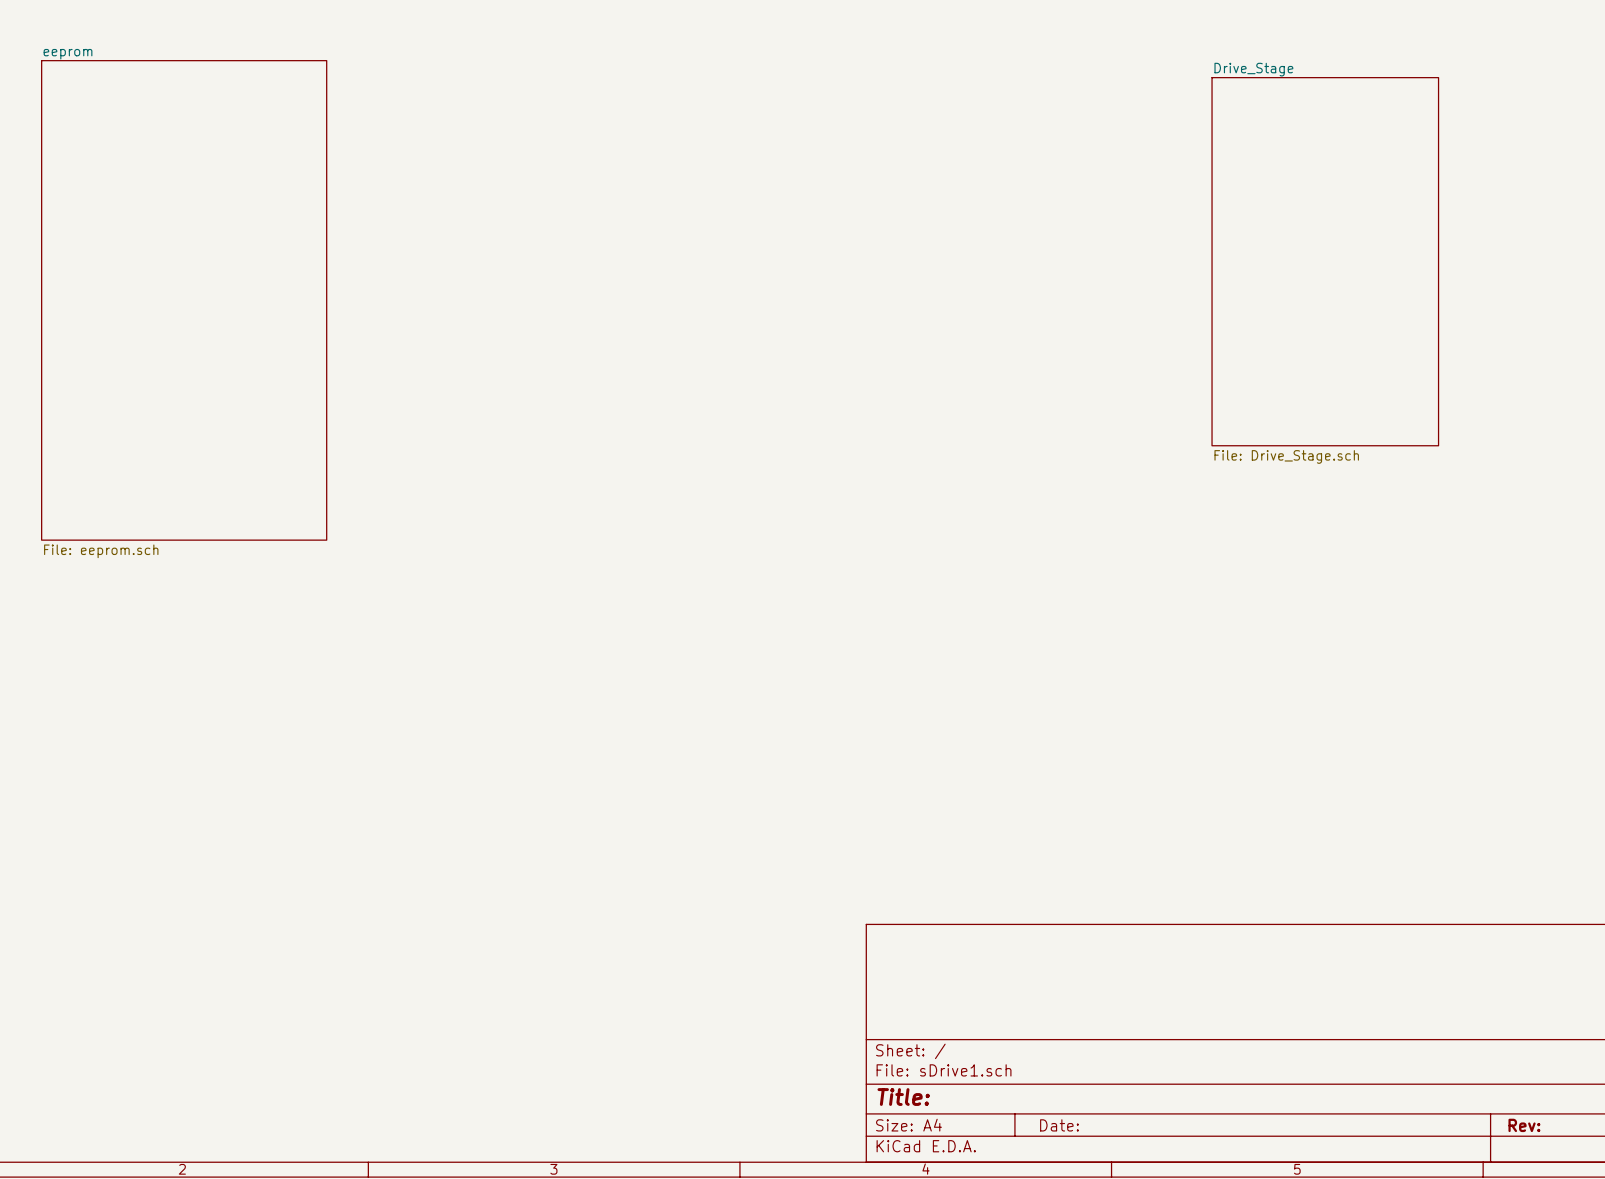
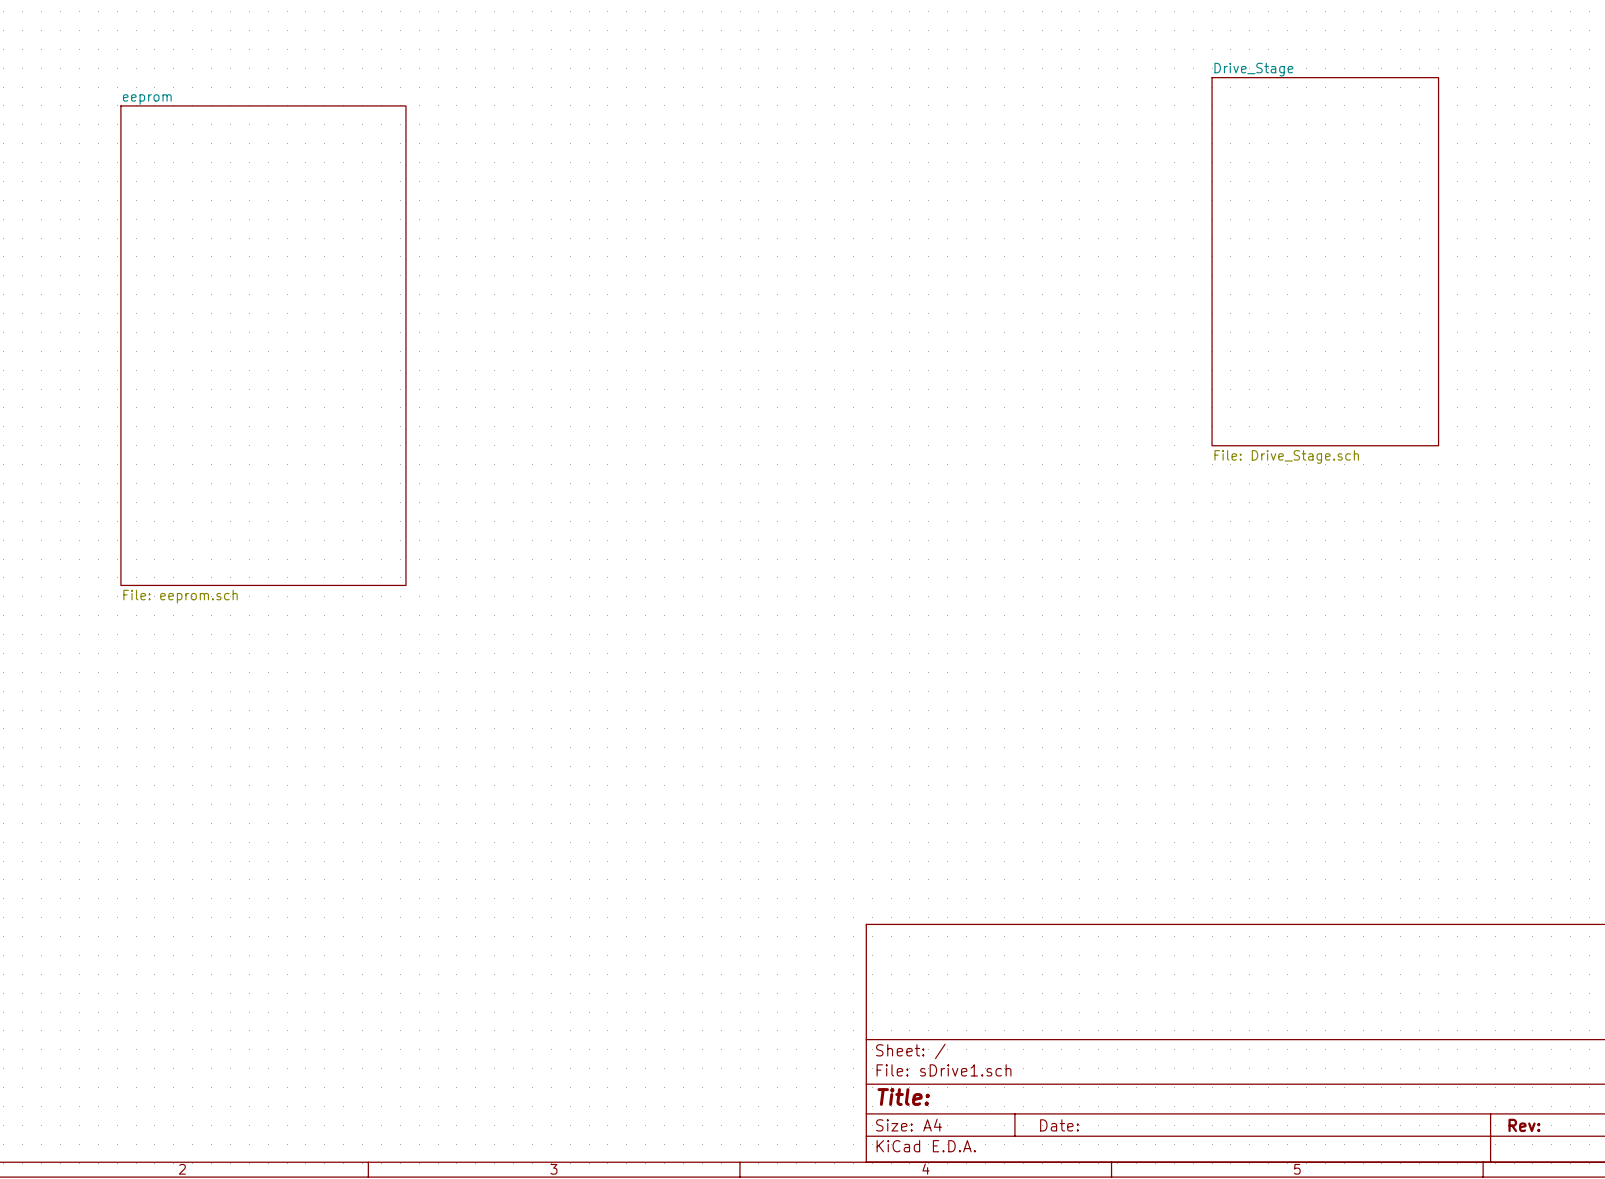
sheet eeprom position: (184, 300) -> (263, 345)

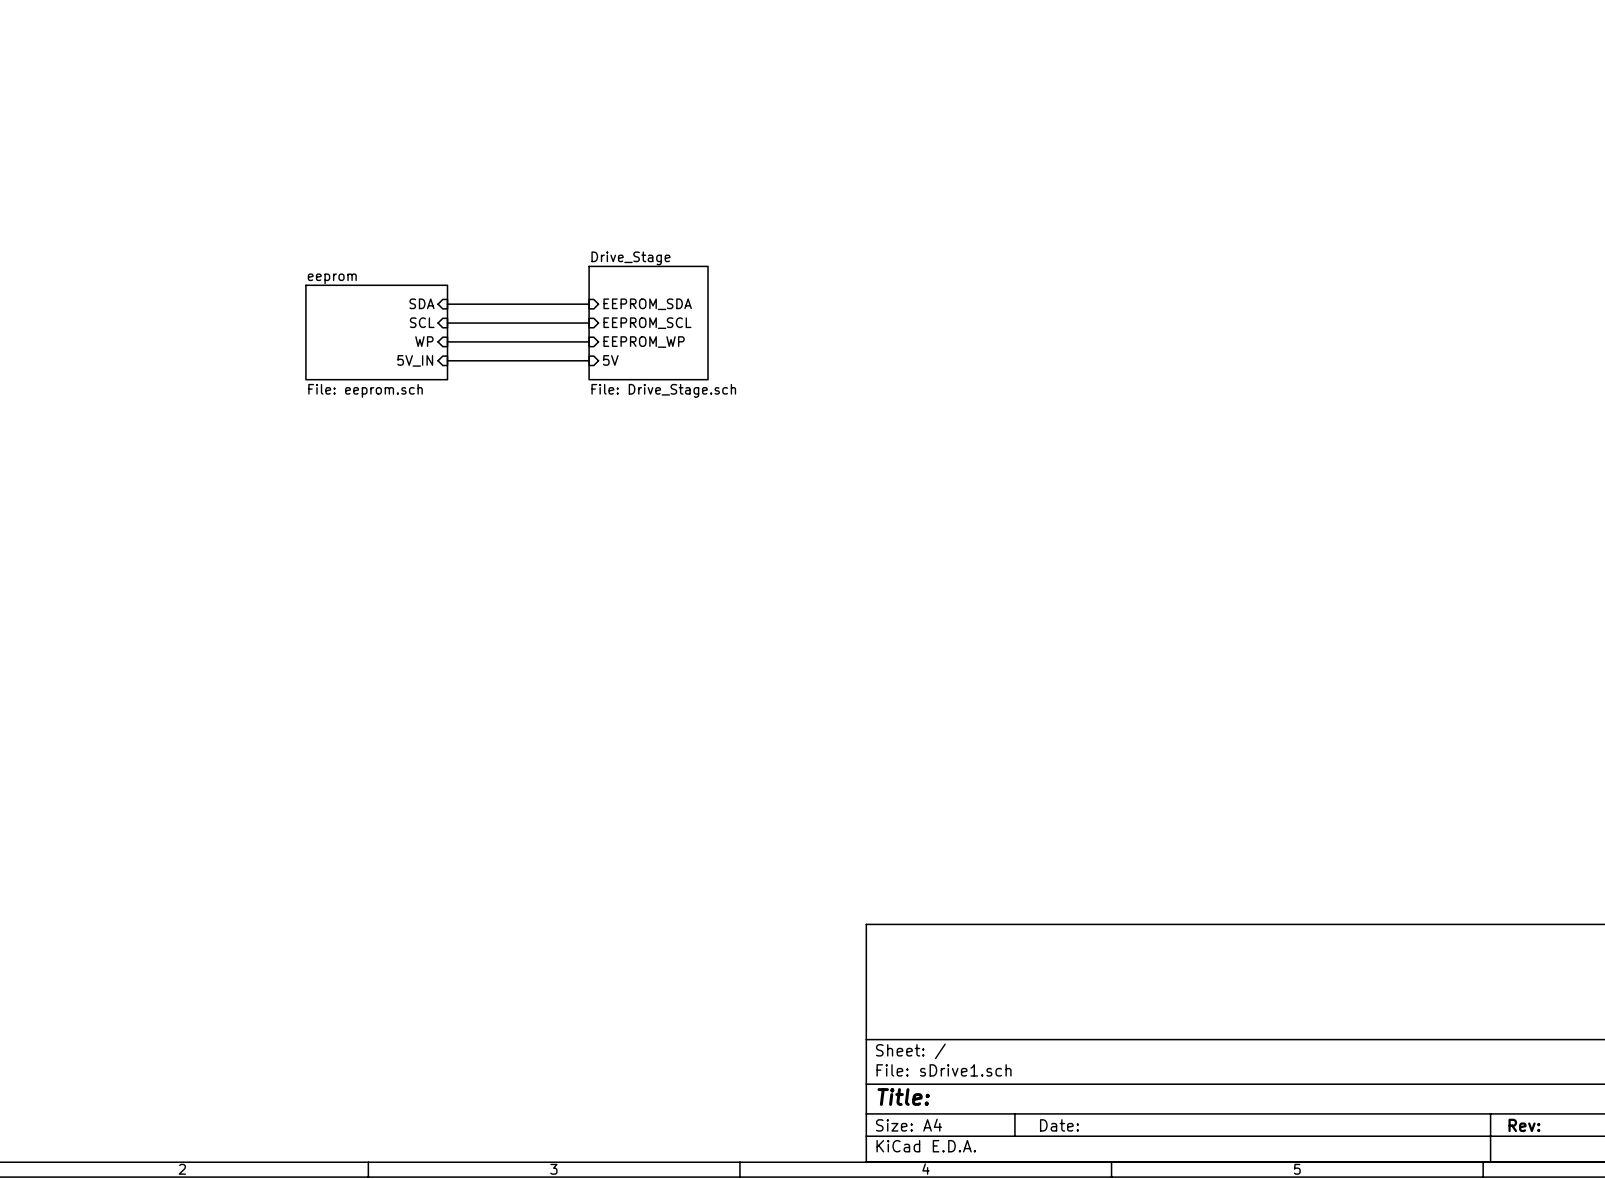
sheet Drive_Stage: File: Drive_Stage.sch (1325, 261) -> none
sheet pin: none -> SDA (421, 303)
wire: none -> (447, 304) (589, 304)
sheet pin: none -> EEPROM_SDA (647, 304)
sheet pin: none -> SCL (422, 322)
wire: none -> (447, 323) (589, 323)
sheet pin: none -> EEPROM_SCL (647, 323)
sheet Drive_Stage: none -> File: Drive_Stage.sch (648, 323)
sheet eeprom: none -> File: eeprom.sch (376, 332)
sheet pin: none -> WP (424, 341)
wire: none -> (447, 341) (589, 341)
sheet pin: none -> EEPROM_WP (644, 342)
sheet eeprom: File: eeprom.sch (263, 345) -> none
sheet pin: none -> 5V_IN (415, 360)
wire: none -> (447, 360) (589, 360)
sheet pin: none -> 5V (610, 360)

